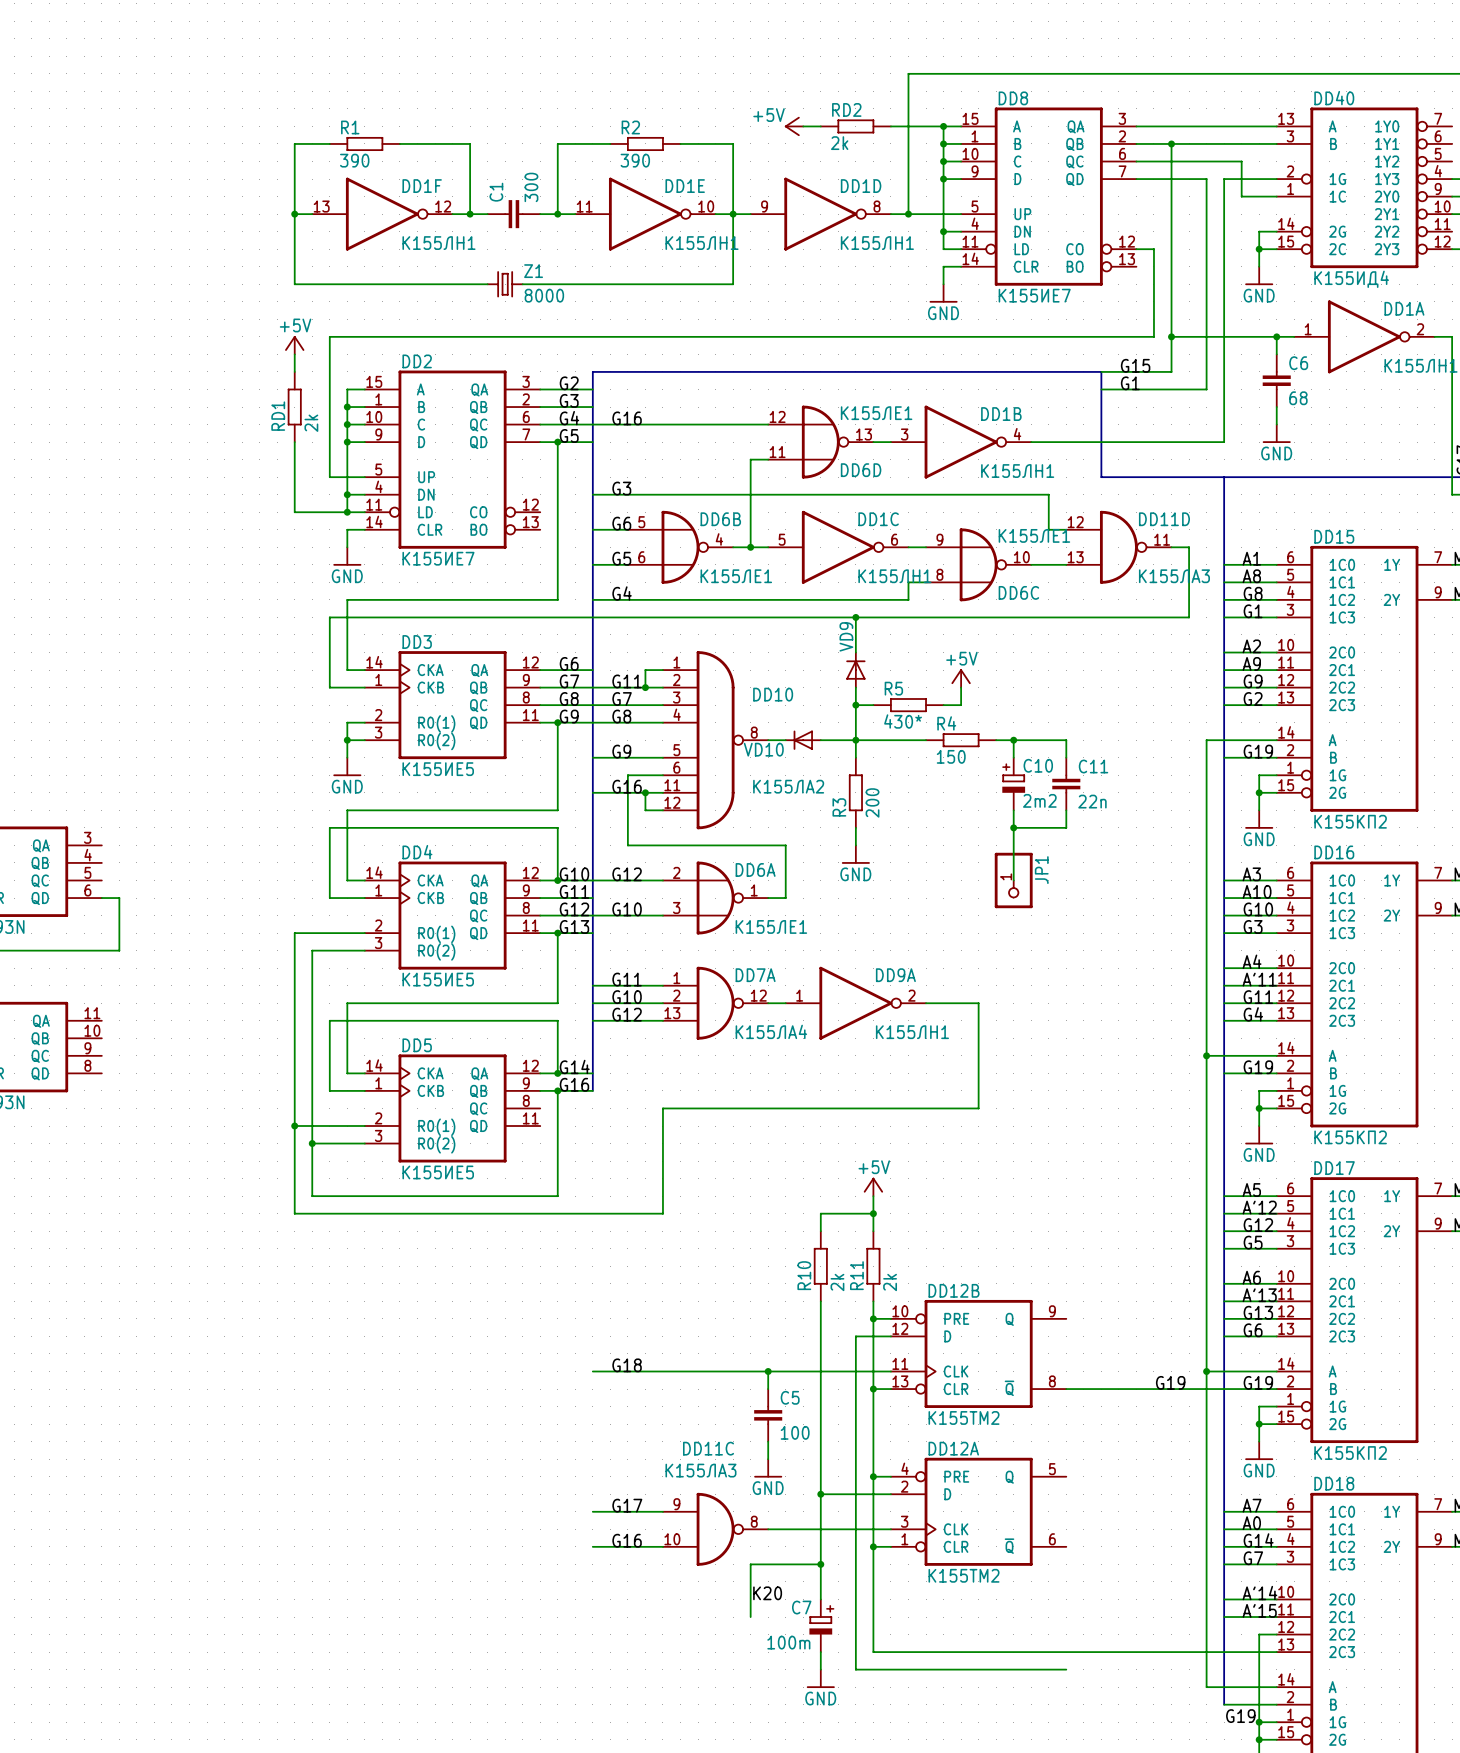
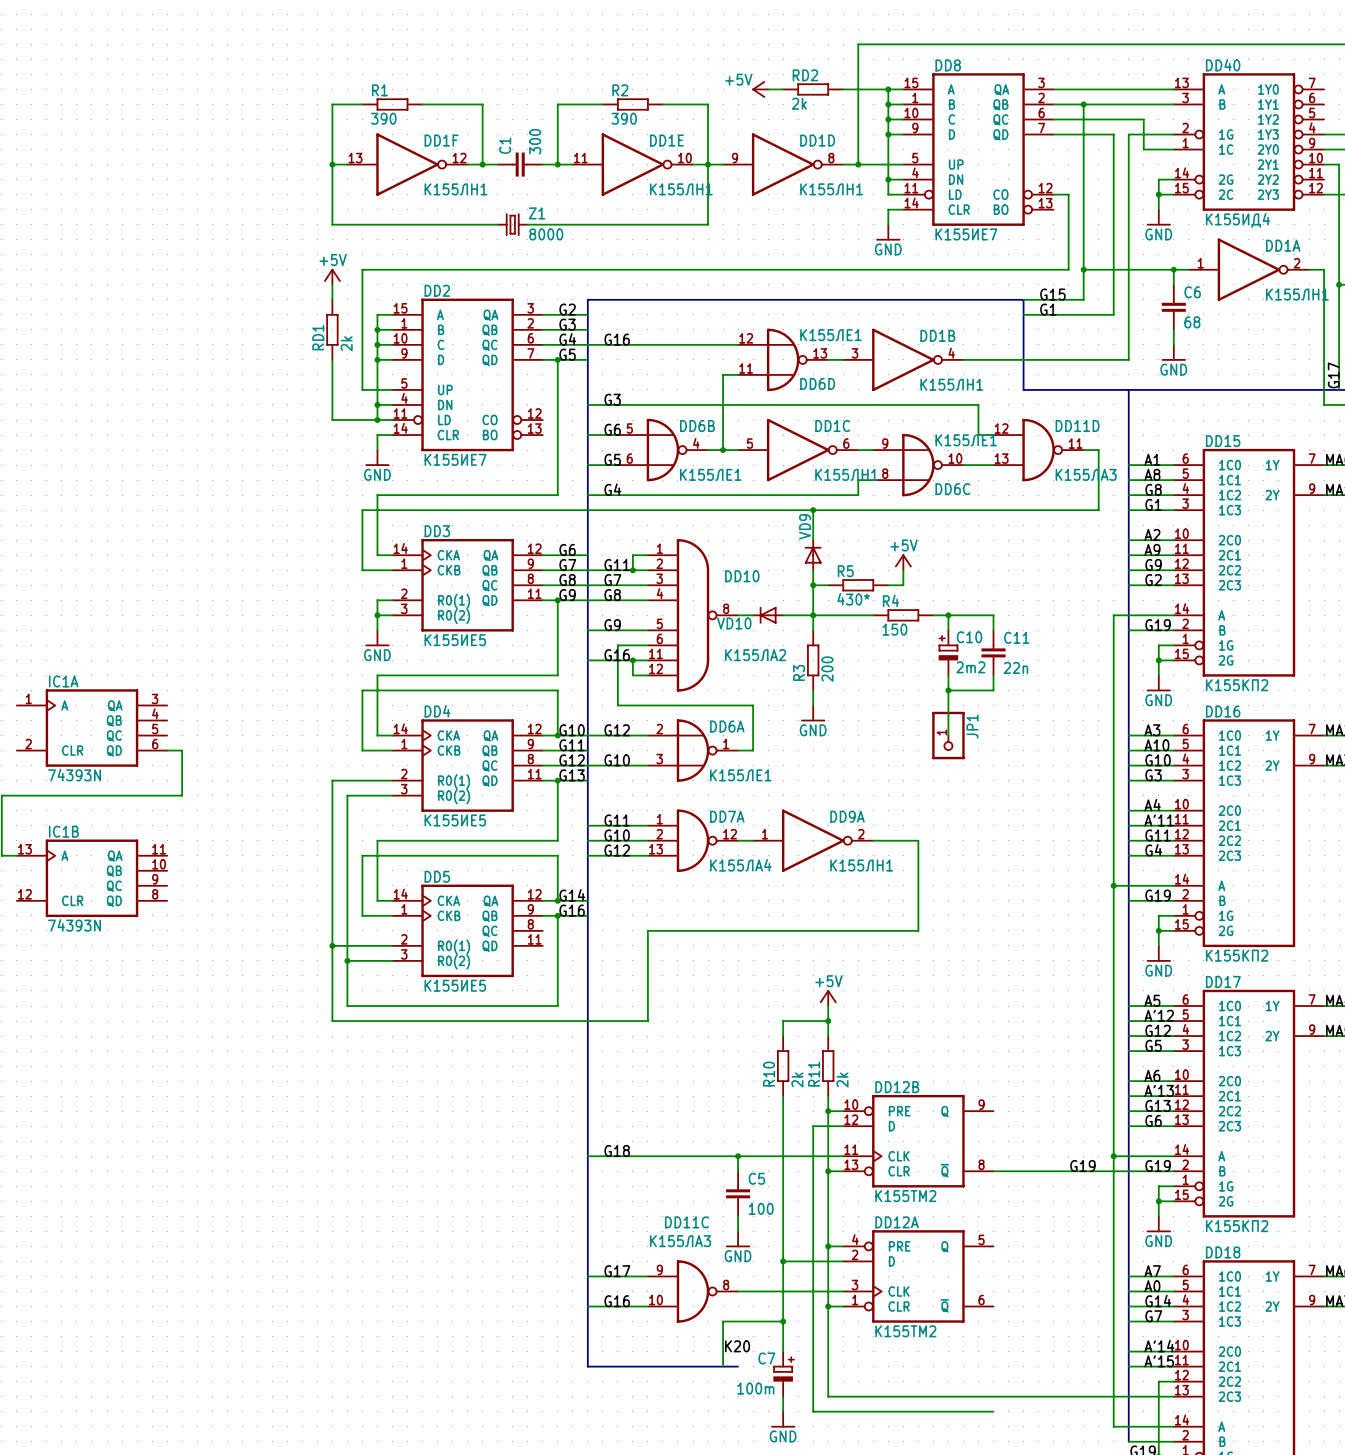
bus: none -> (587, 915) (587, 1366) (738, 1366)

